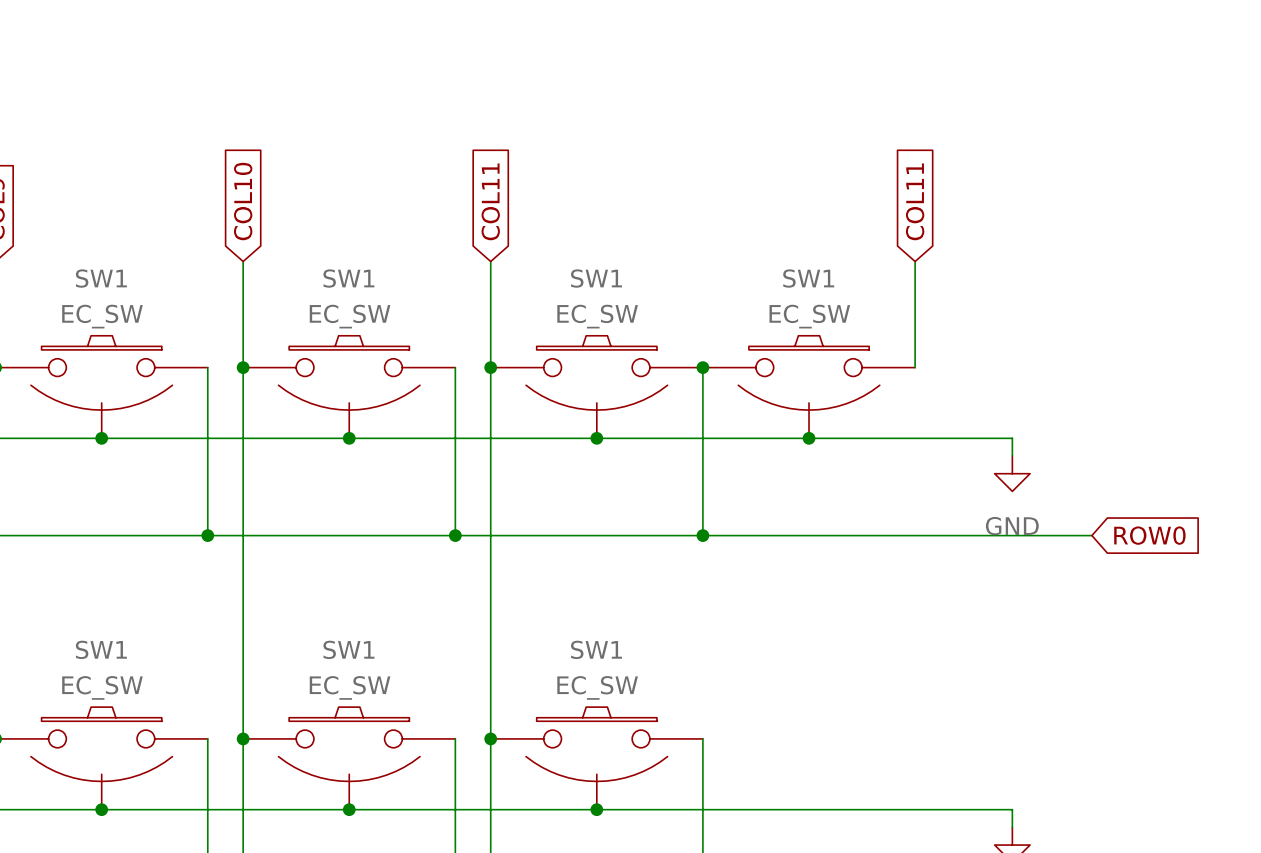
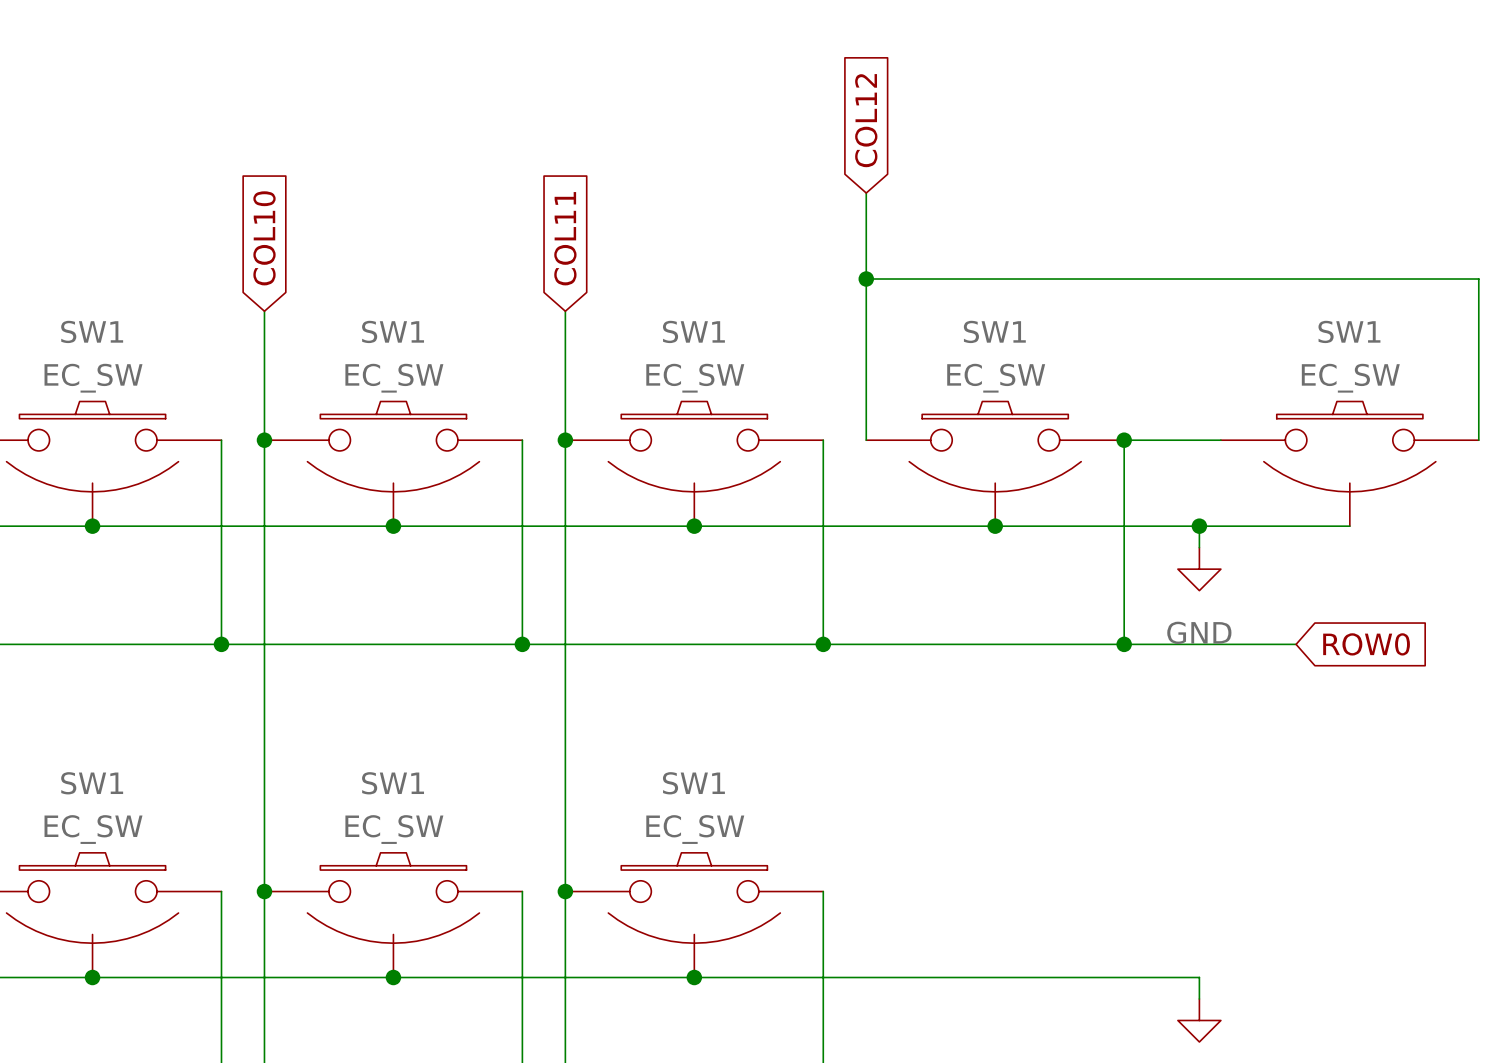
global label: none -> COL12 (866, 120)
wire: none -> (866, 193) (866, 440)
global label: COL11 (915, 201) -> none
wire: none -> (866, 279) (1478, 279) (1478, 440)
junction: none -> (866, 279)
wire: (915, 261) (915, 367) -> none
junction: (702, 367) -> none
junction: none -> (1124, 440)
wire: none -> (1220, 440) (1124, 440) (1124, 644)
SW1 position: (809, 387) -> (995, 463)
SW1: none -> EC_SW (1349, 463)
junction position: (809, 438) -> (995, 526)
wire: none -> (1199, 526) (1349, 526)
junction: none -> (1199, 526)
junction: none -> (1124, 644)

